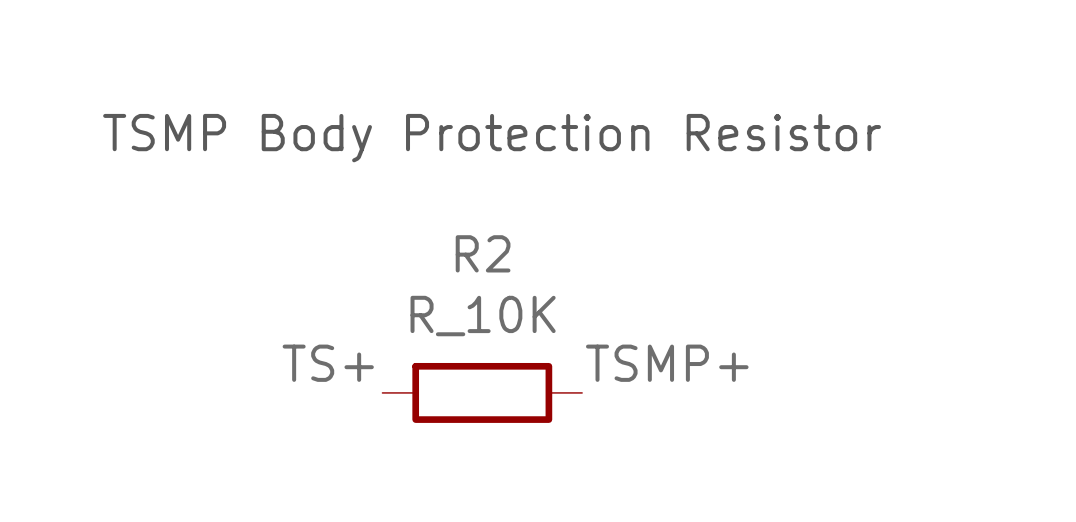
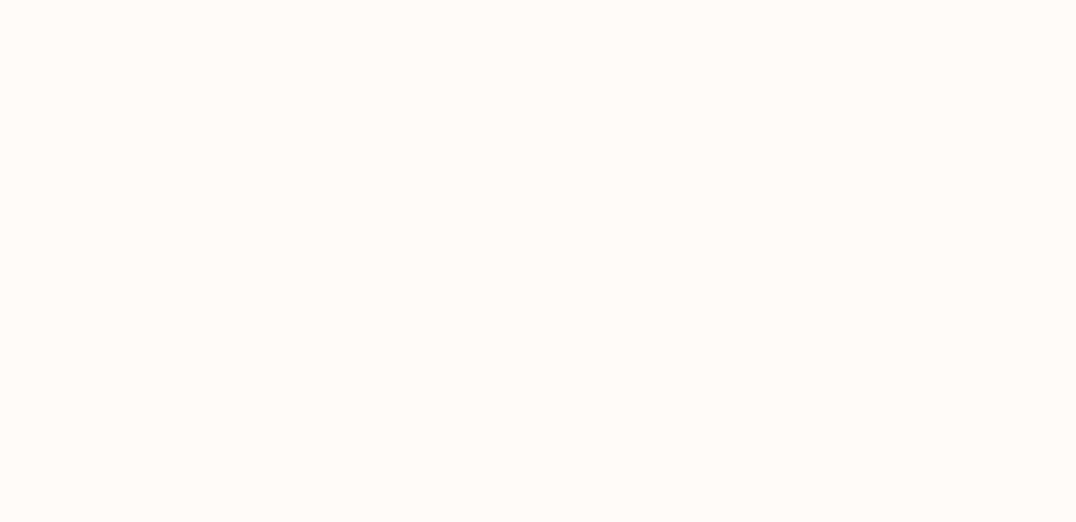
text: TSMP Body Protection Resistor (492, 138) -> none
label: TS+ (328, 363) -> none
label: TSMP+ (667, 363) -> none
R2: R_10K (482, 392) -> none

